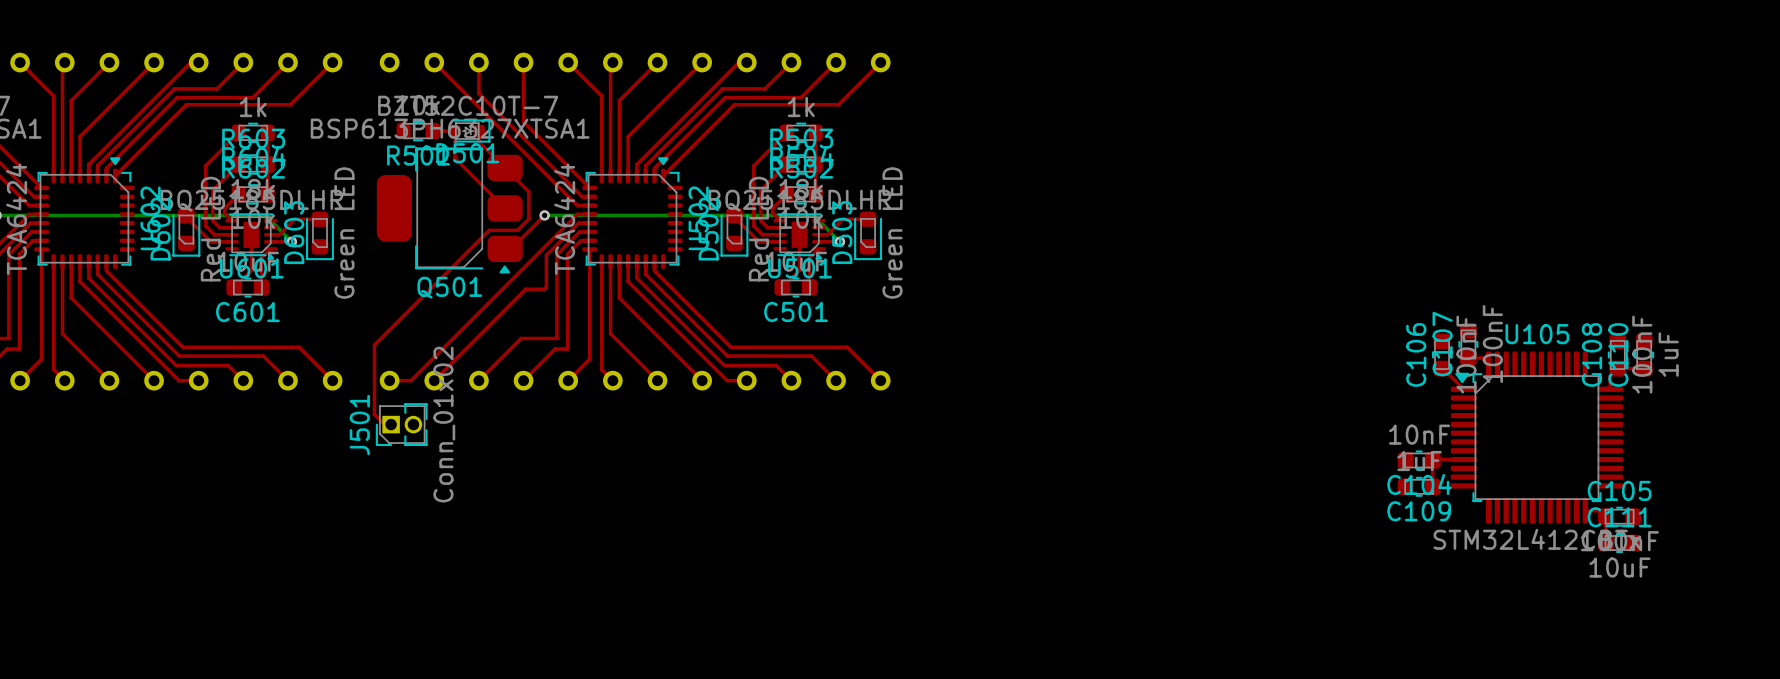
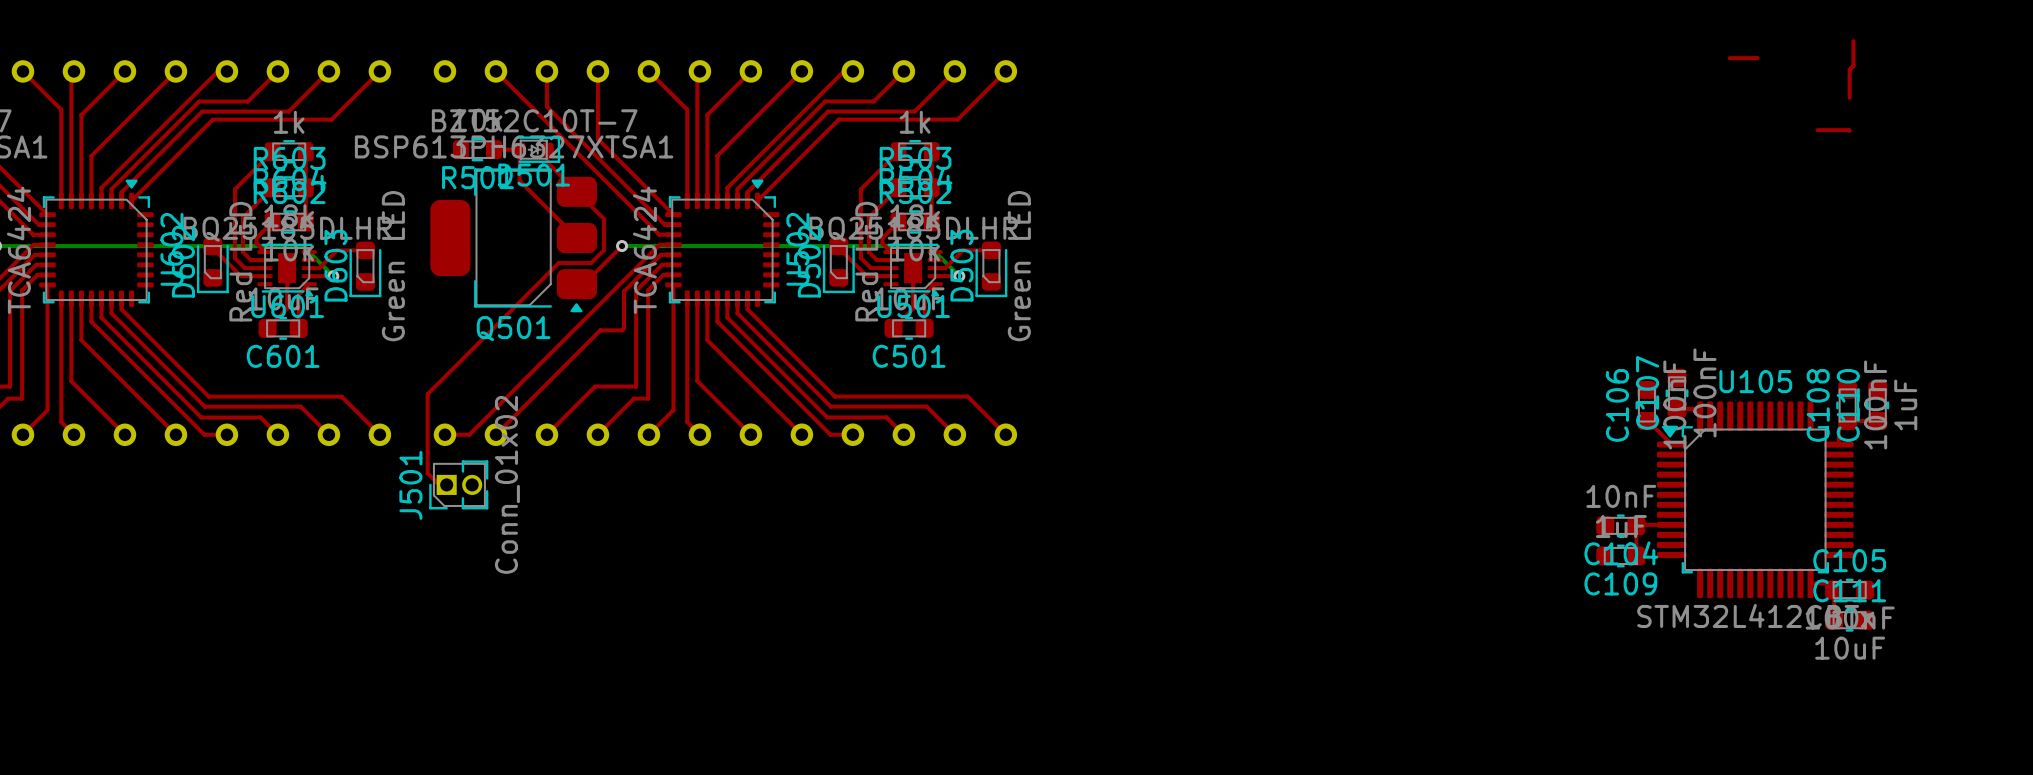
top track: none -> (1853, 41) (1853, 65) (1849, 69) (1849, 97)
top track: none -> (1729, 58) (1757, 58)
top track: none -> (1817, 130) (1849, 130)

